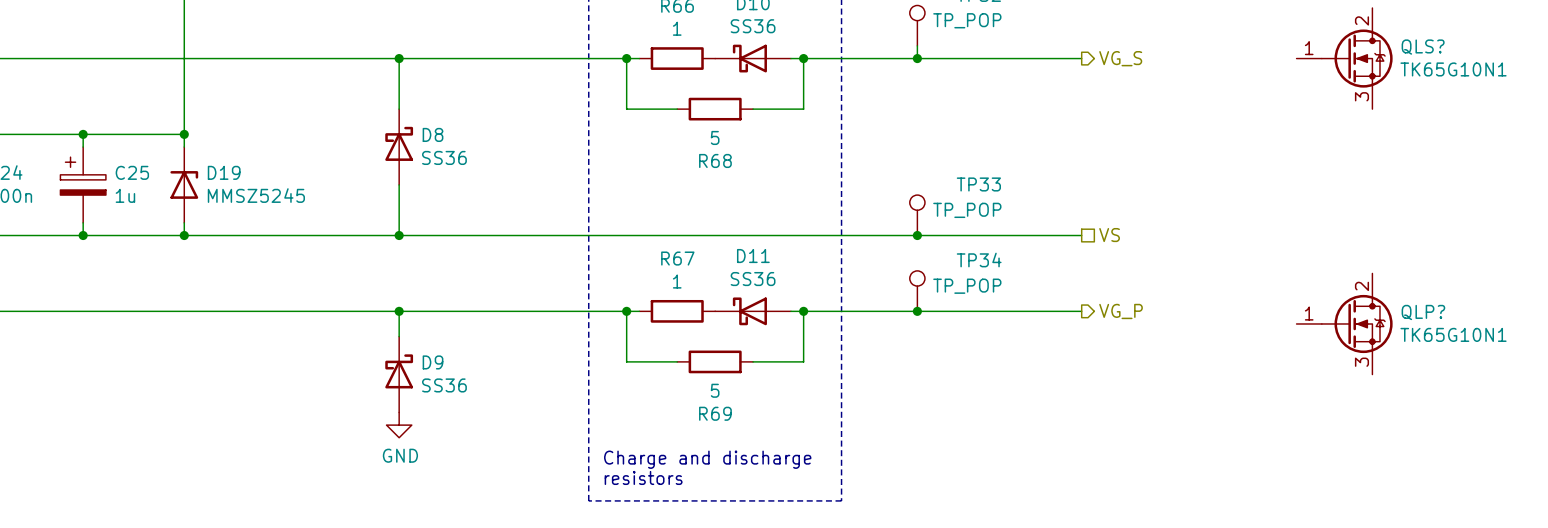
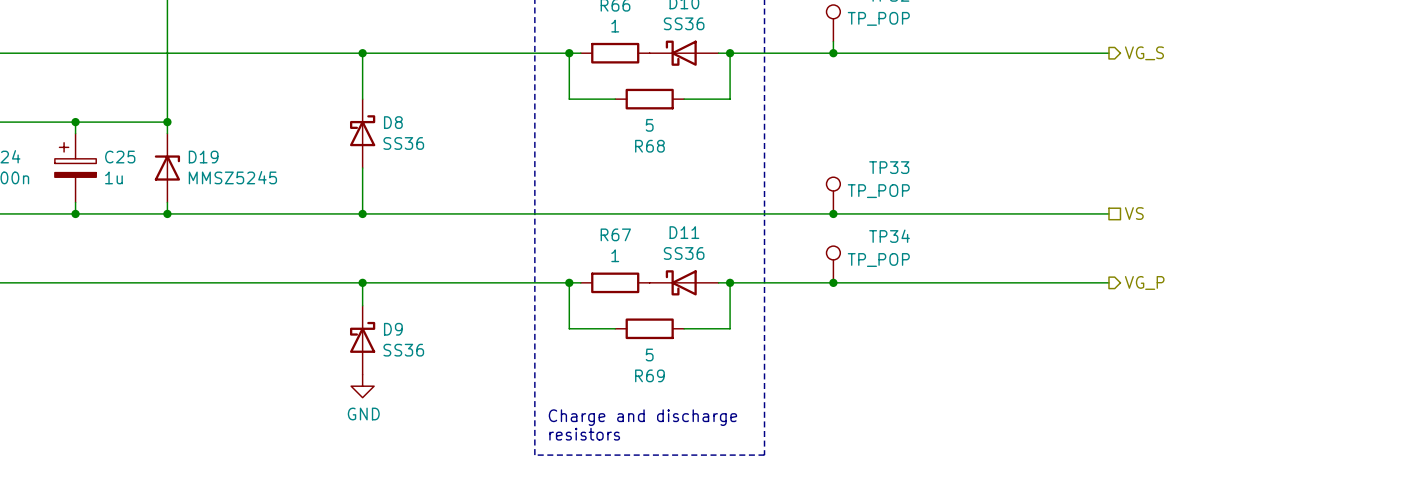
wire: none -> (982, 53) (1108, 53)
hierarchical label position: VG_S (1120, 58) -> VG_S (1144, 53)
QLS?: TK65G10N1 (1344, 58) -> none
wire: none -> (982, 213) (1108, 213)
hierarchical label position: VS (1109, 235) -> VS (1134, 213)
wire: none -> (982, 282) (1108, 282)
hierarchical label position: VG_P (1121, 311) -> VG_P (1144, 282)
QLP?: TK65G10N1 (1344, 323) -> none

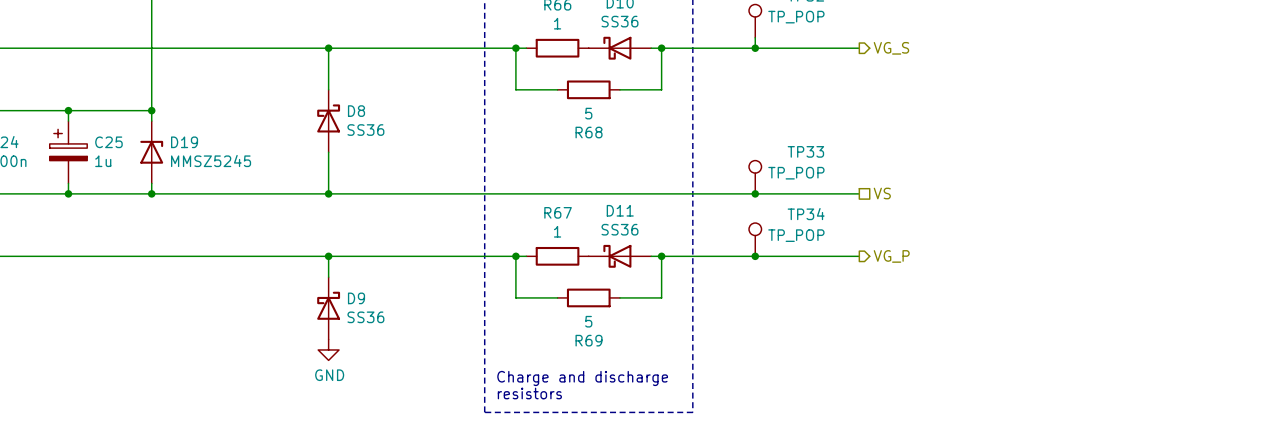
wire: (948, 53) (1108, 53) -> none
hierarchical label position: VG_S (1144, 53) -> VG_S (891, 48)
wire: (948, 213) (1108, 213) -> none
hierarchical label position: VS (1134, 213) -> VS (882, 193)
wire: (948, 282) (1108, 282) -> none
hierarchical label position: VG_P (1144, 282) -> VG_P (891, 256)

